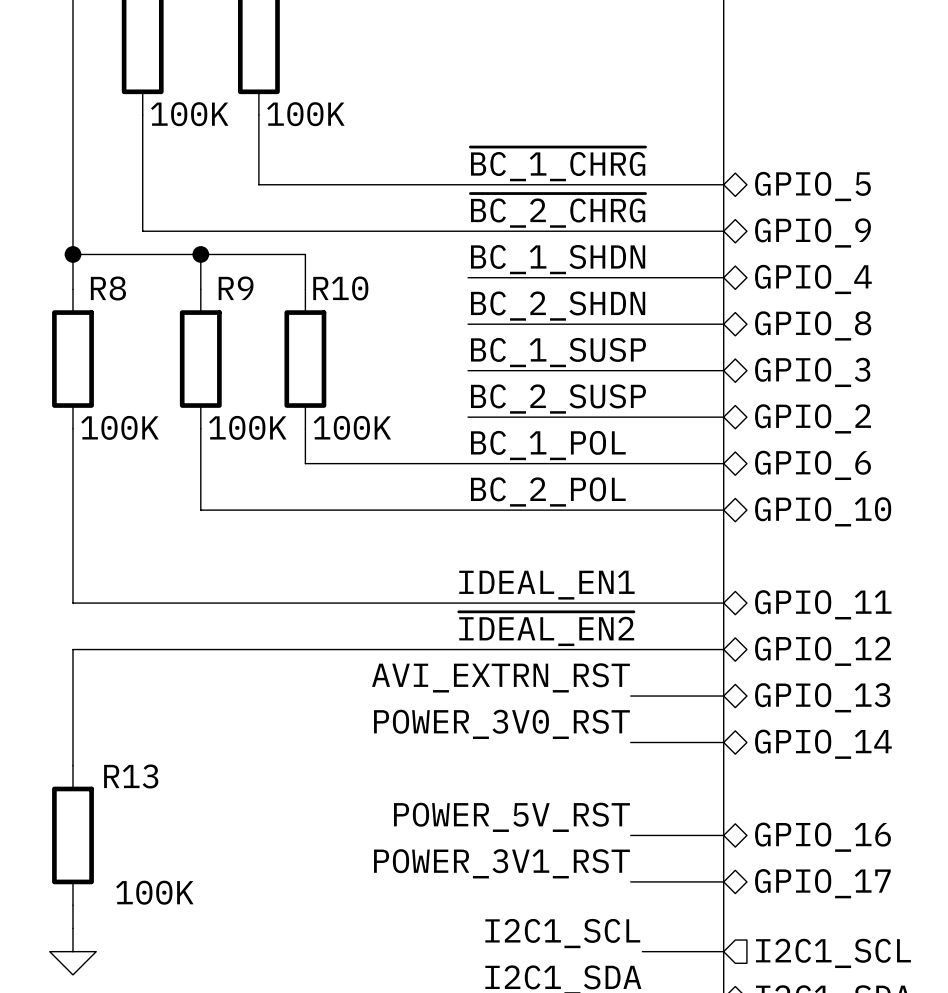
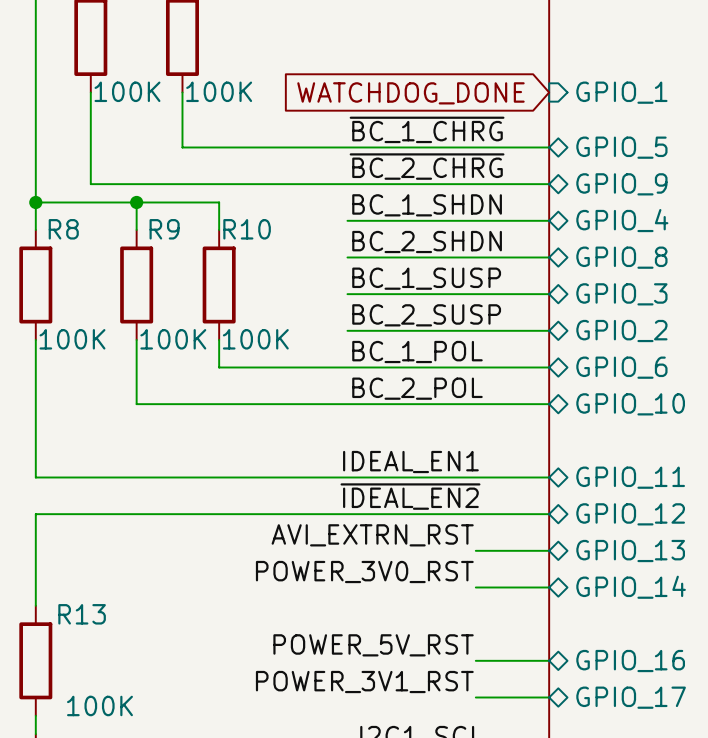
sheet pin: none -> GPIO_1 (621, 92)
global label: none -> WATCHDOG_DONE (410, 93)

